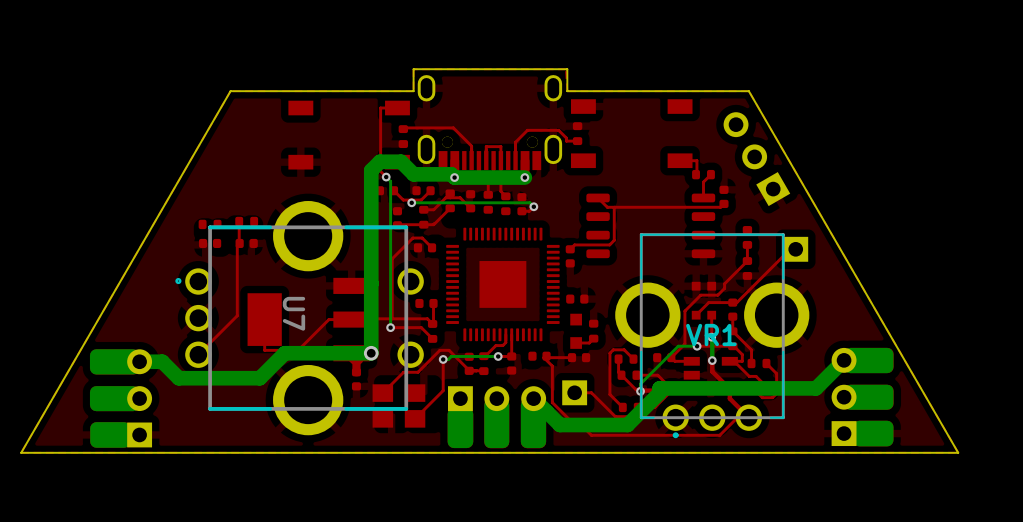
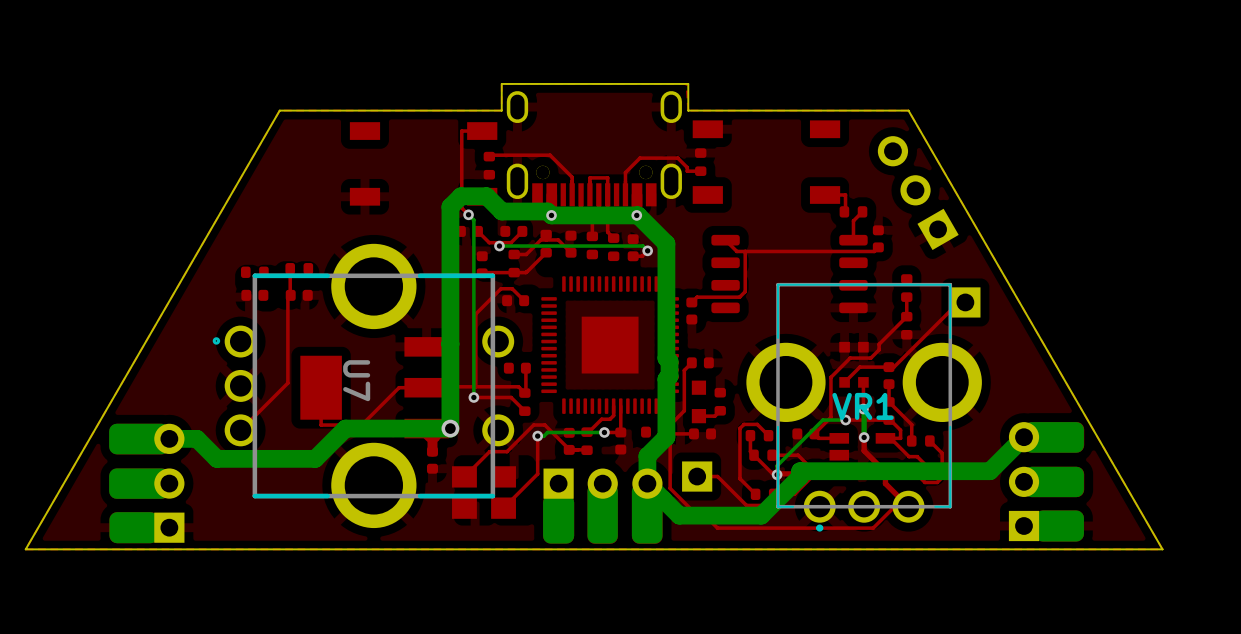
bottom track: none -> (636, 215) (666, 243) (666, 358) (669, 361) (669, 376) (666, 379) (666, 437) (647, 456) (647, 483)
top track: none -> (691, 362) (684, 370) (684, 410) (663, 432)

